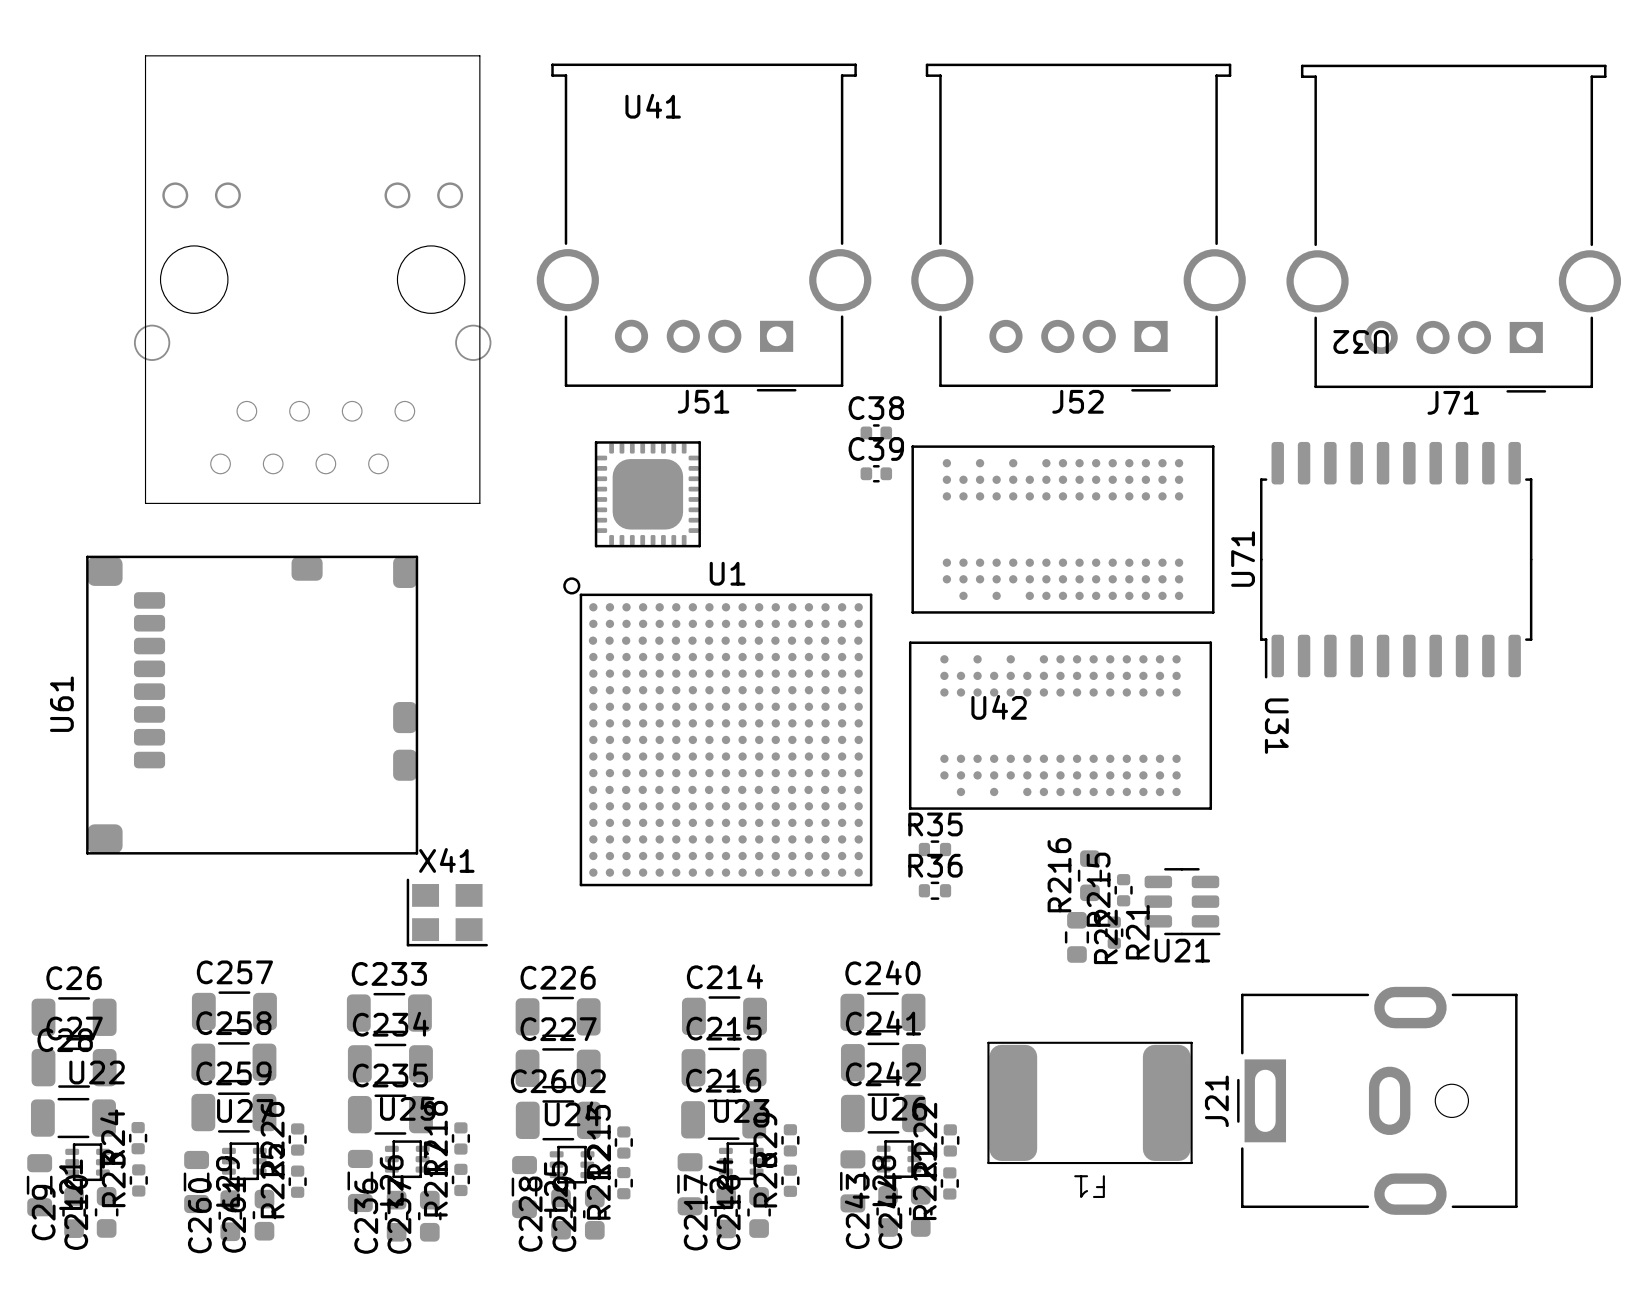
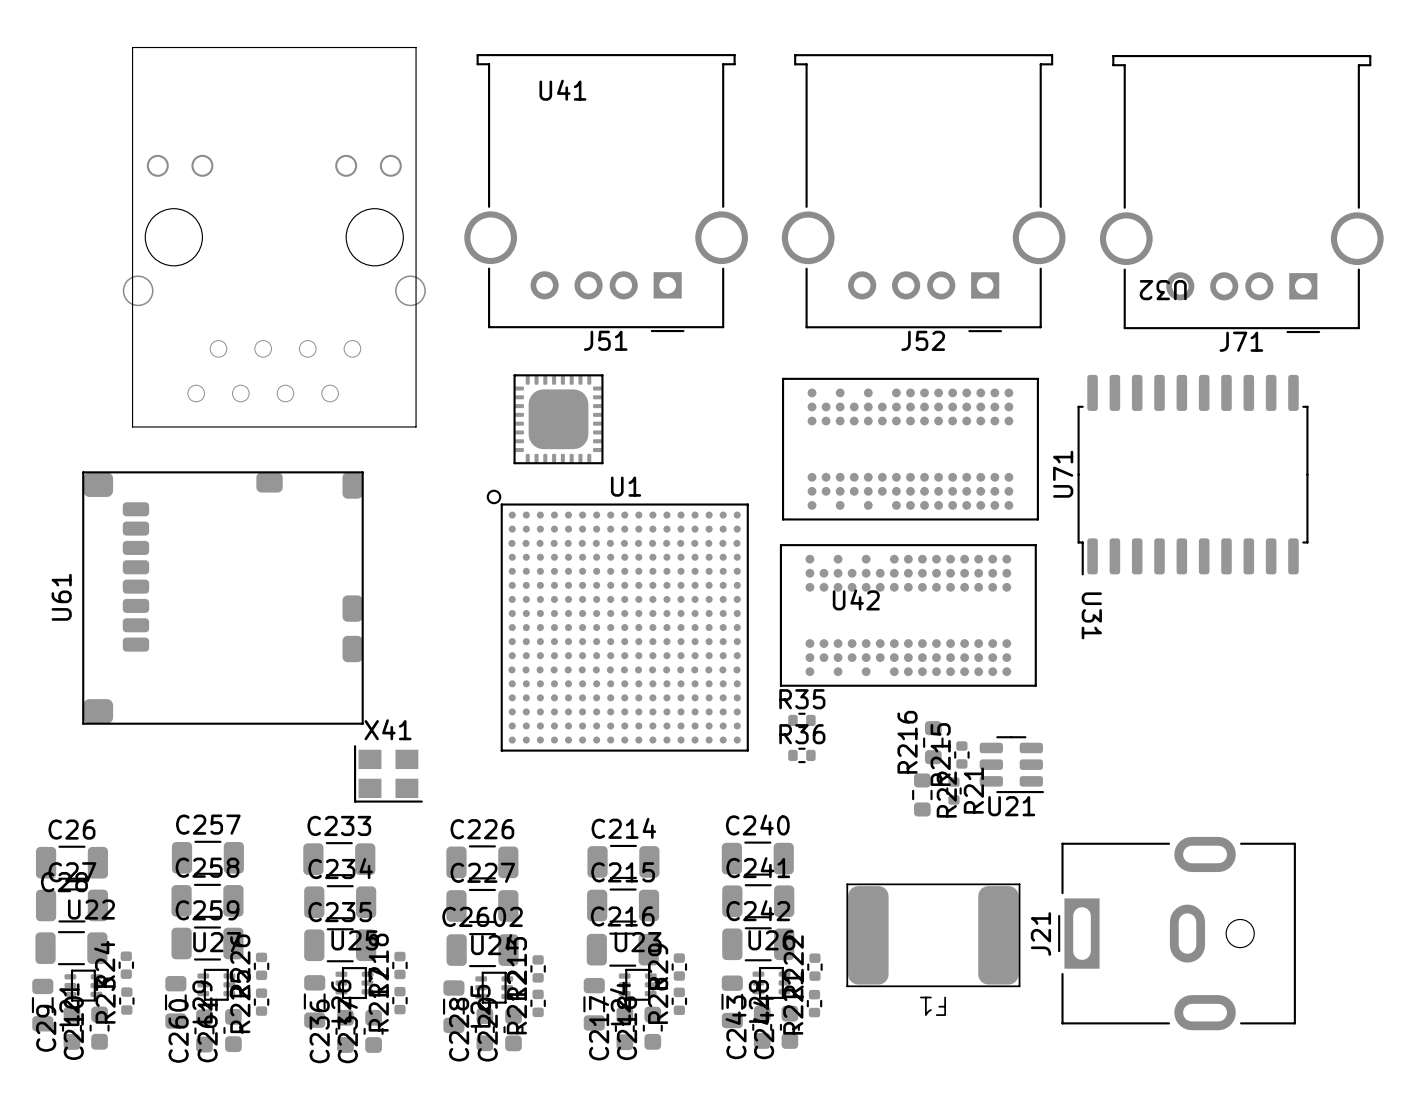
C38: (876, 432) -> none
U32 footprint: [911, 445, 1215, 614] -> [781, 377, 1039, 521]
C39: (876, 473) -> none
U31 footprint: [908, 641, 1213, 810] -> [779, 544, 1037, 687]

